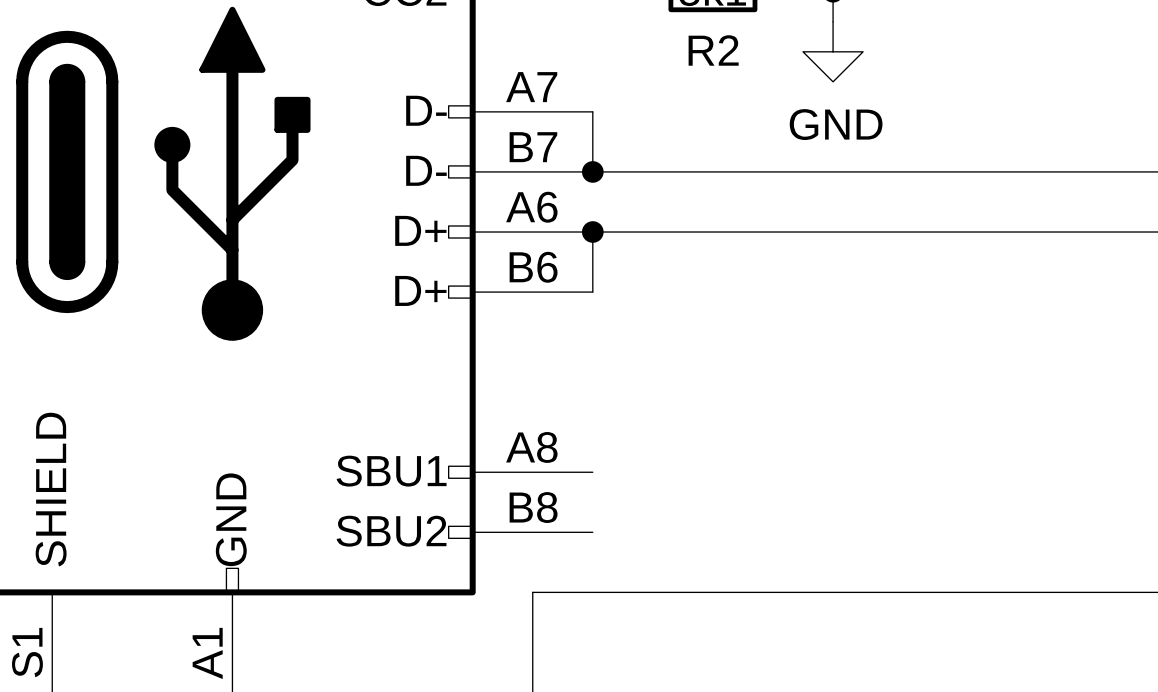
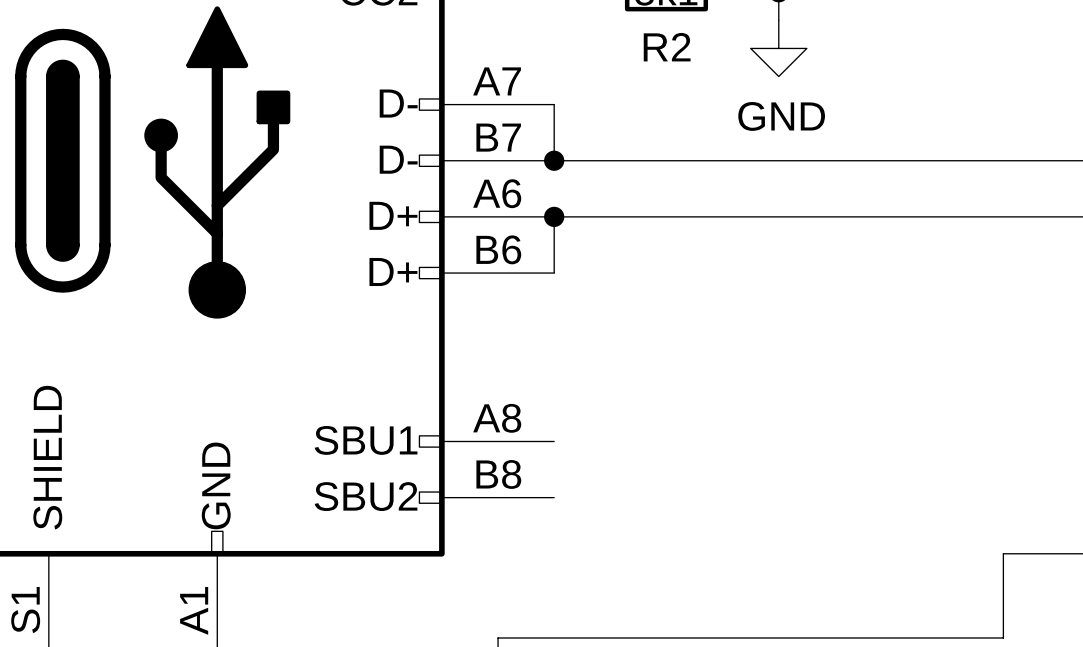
wire: (1073, 592) (532, 592) (532, 682) -> (1003, 553) (1003, 638) (498, 638)

